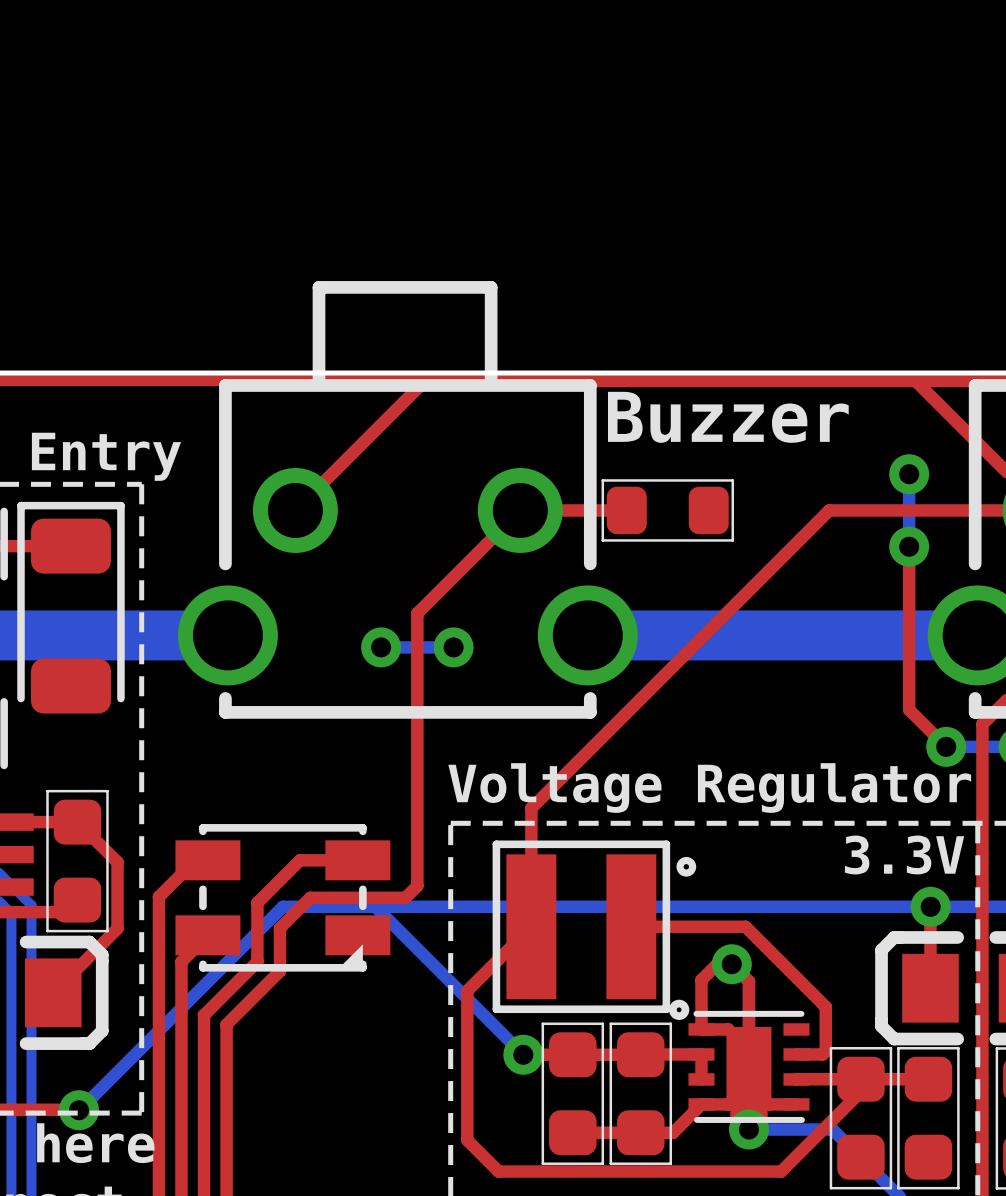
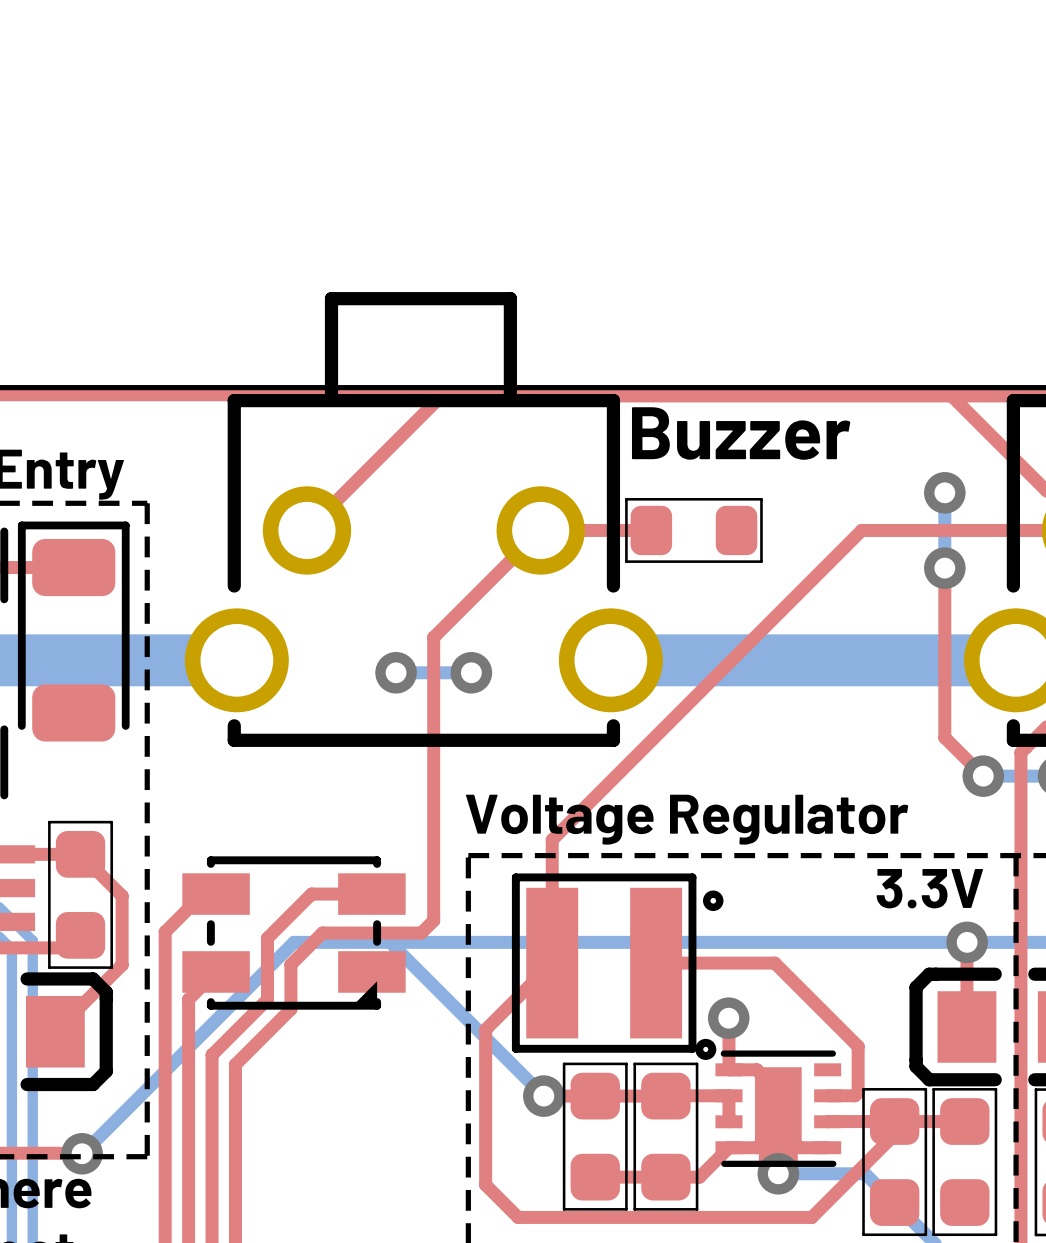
via position: (731, 964) -> (728, 1018)
top track: (701, 980) (717, 964) (731, 964) (748, 981) (748, 1050) -> none

